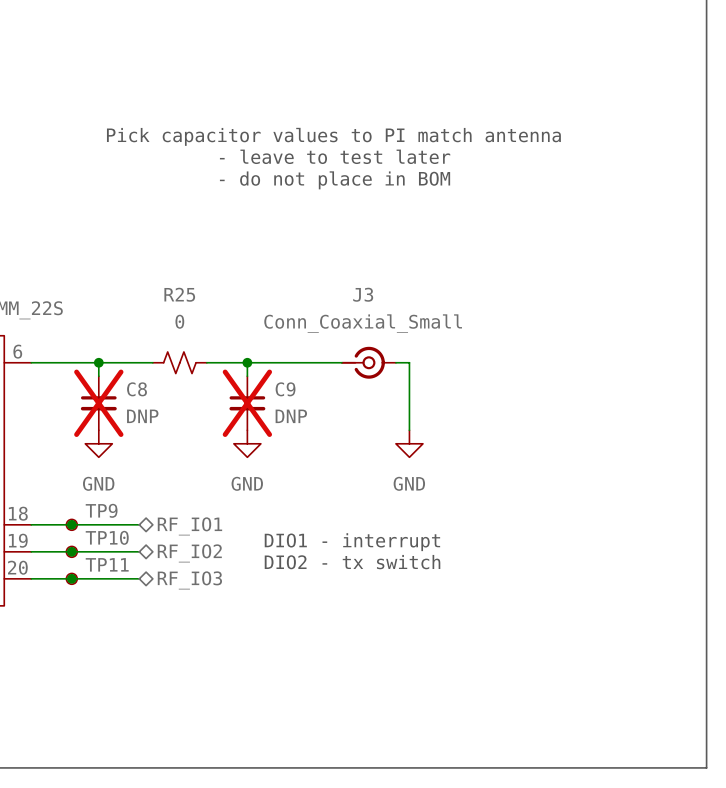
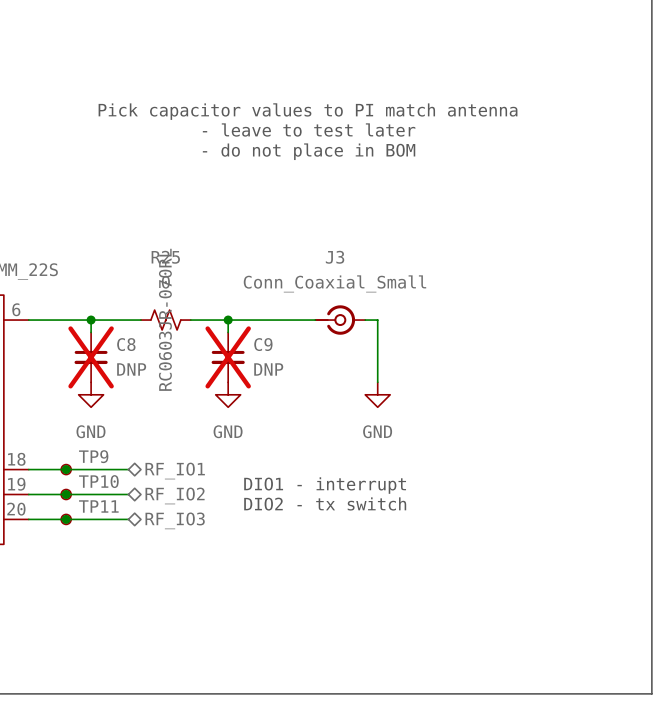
R25 text: none -> RC0603JR-070RL (165, 319)

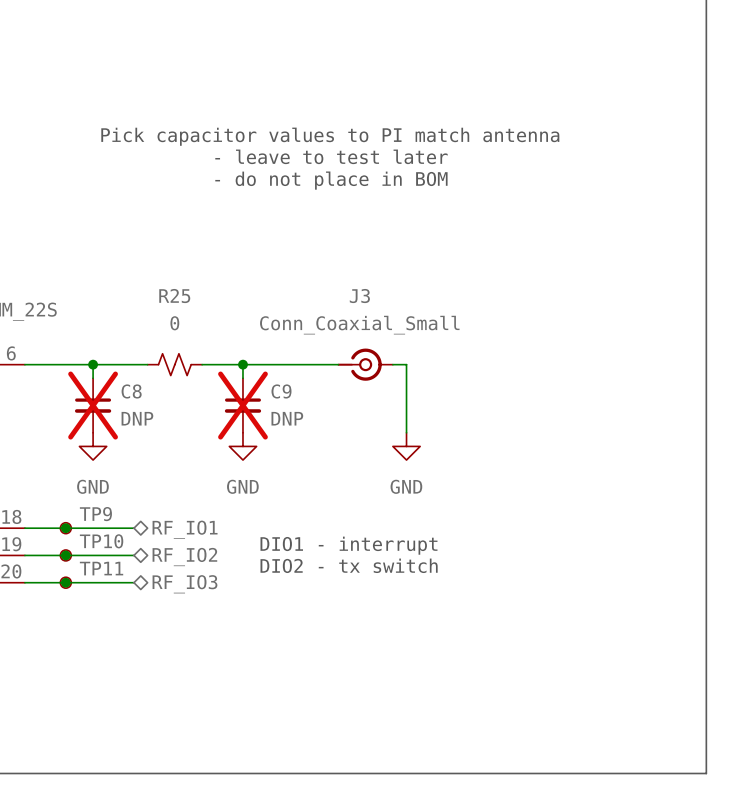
R25 text: RC0603JR-070RL (165, 319) -> none

